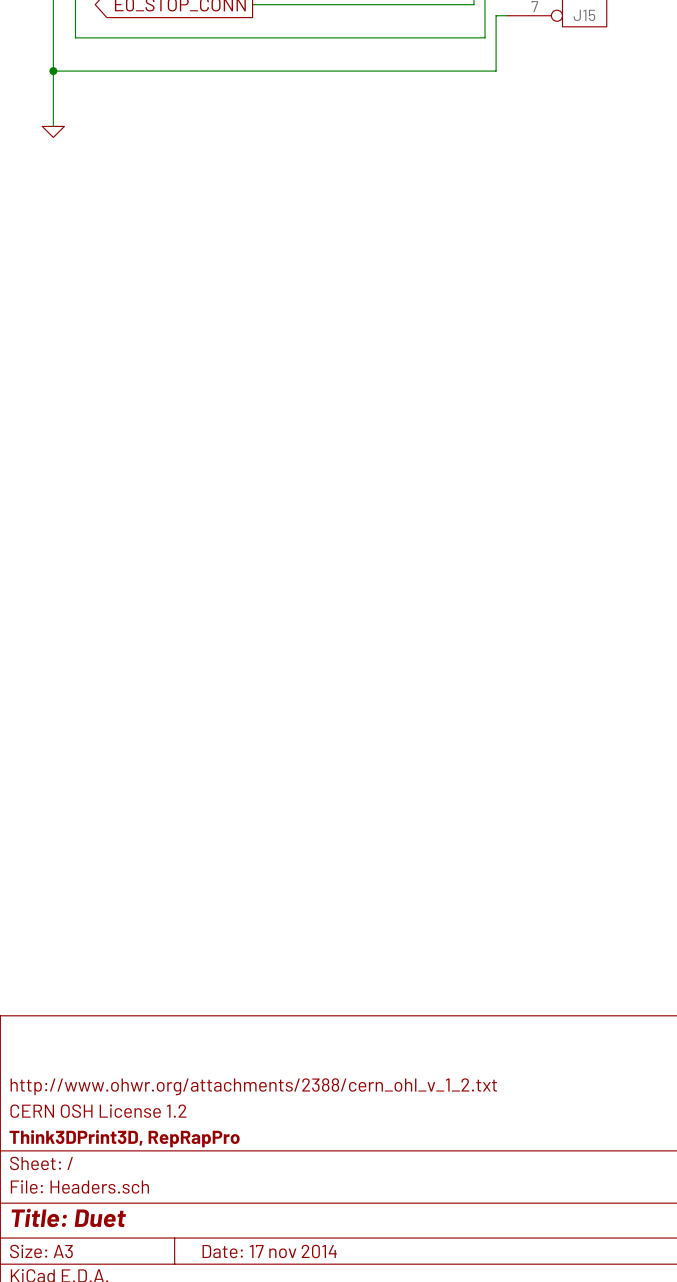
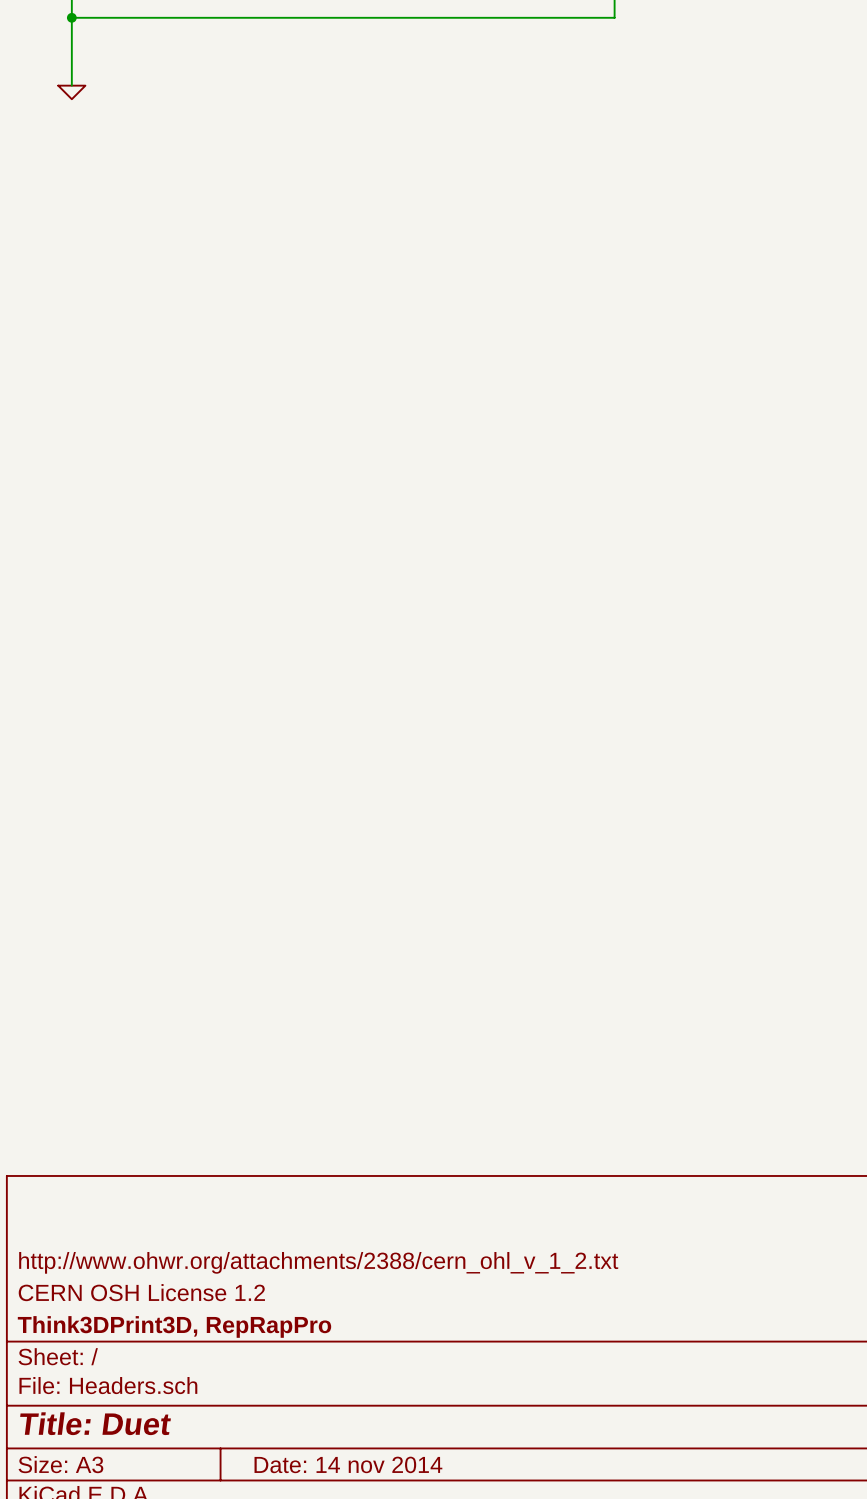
title block: Date: 17 nov 2014 (269, 1251) -> Date: 14 nov 2014 (348, 1464)

